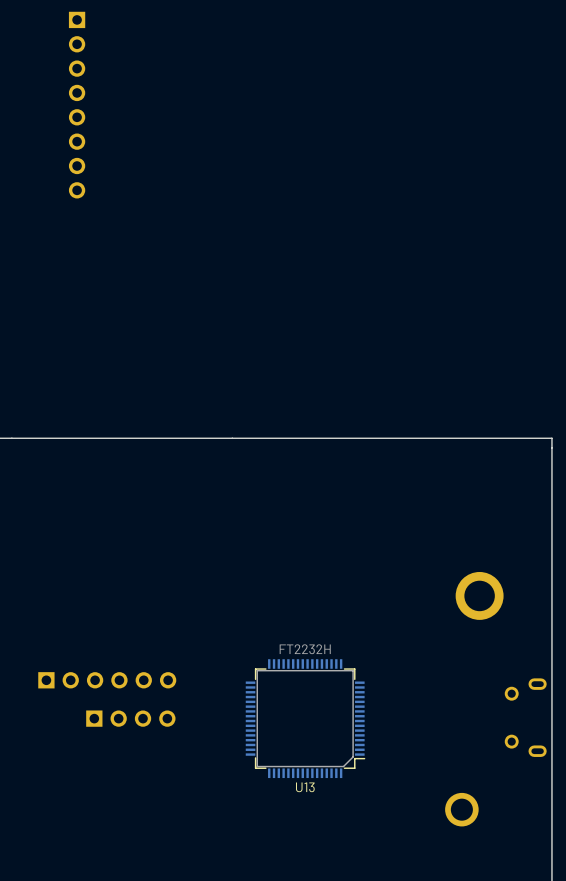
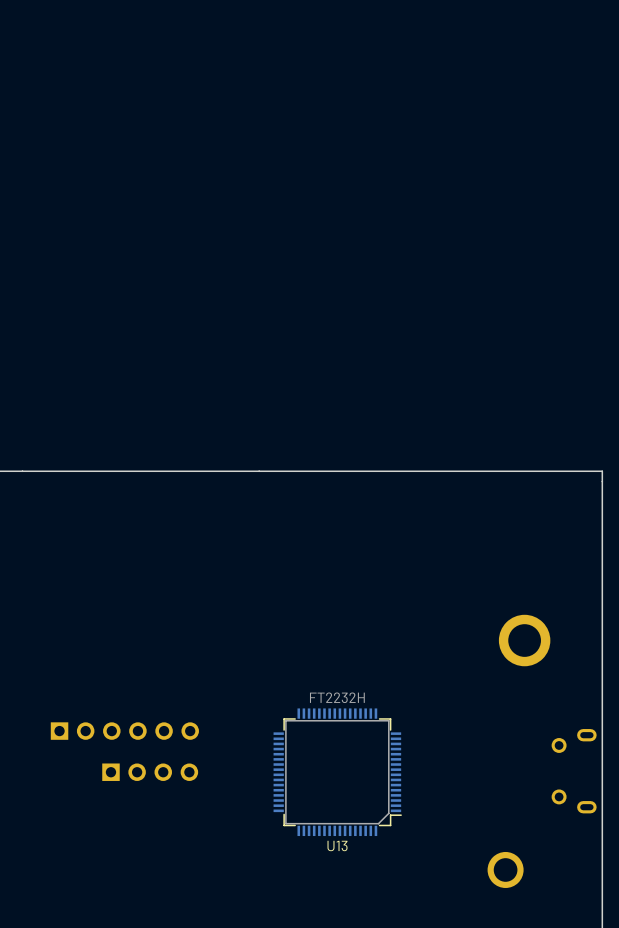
part: (77, 105) -> none

